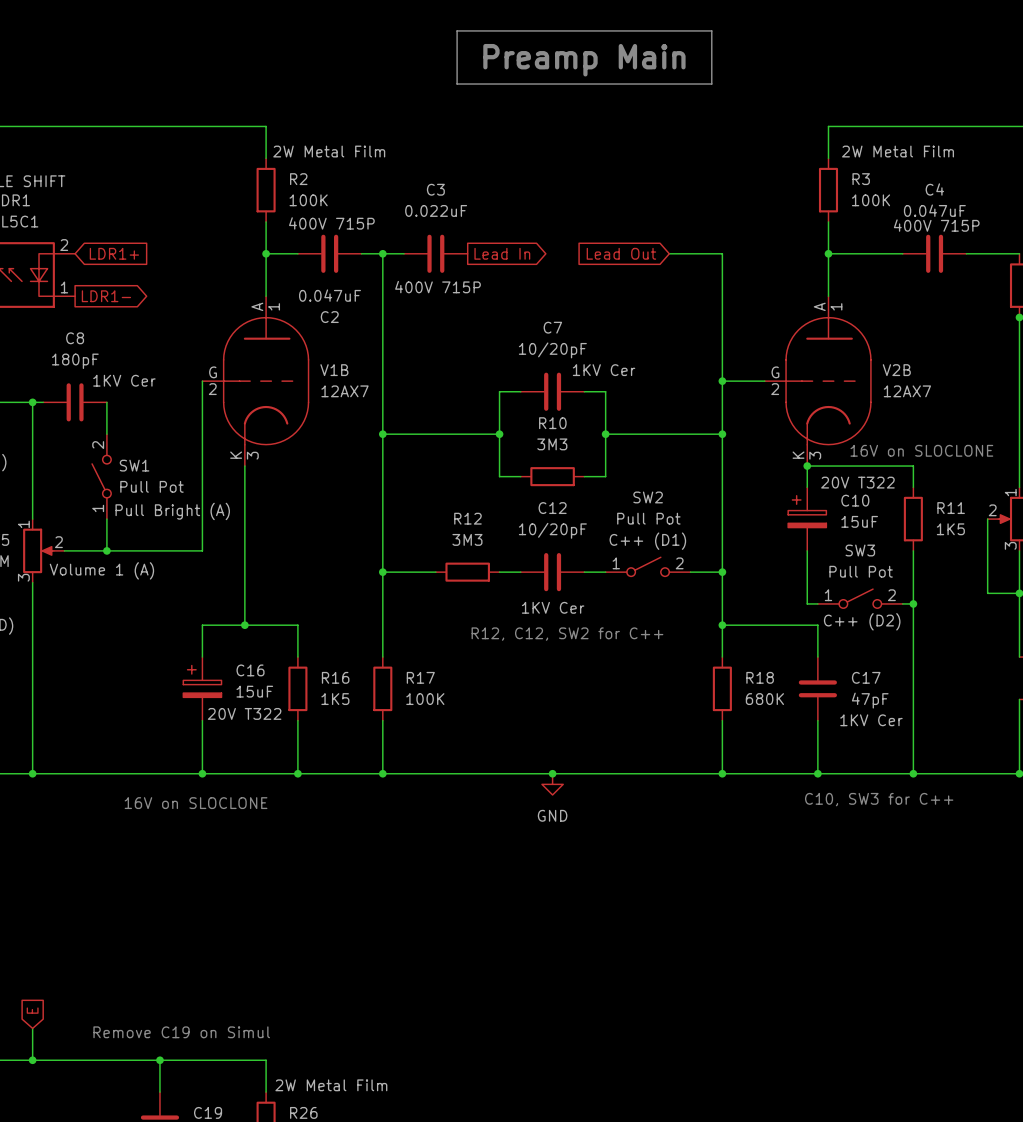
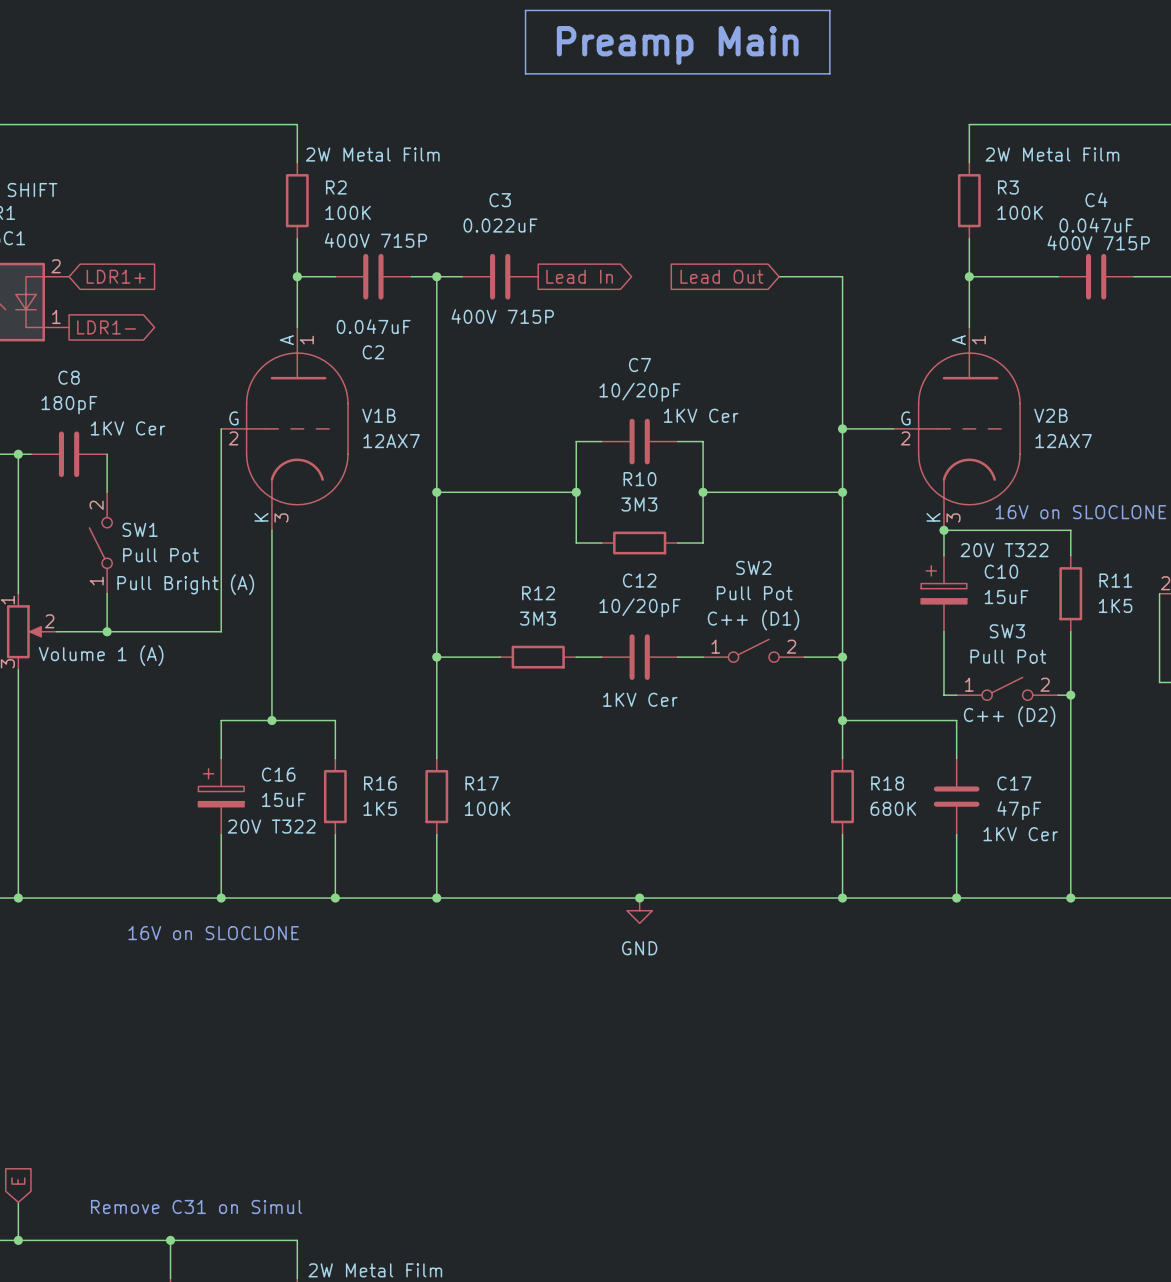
text: R12, C12, SW2 for C++ (567, 634) -> none
text: C10, SW3 for C++ (879, 799) -> none
text: Remove C19 on Simul (181, 1032) -> Remove C31 on Simul (196, 1206)

